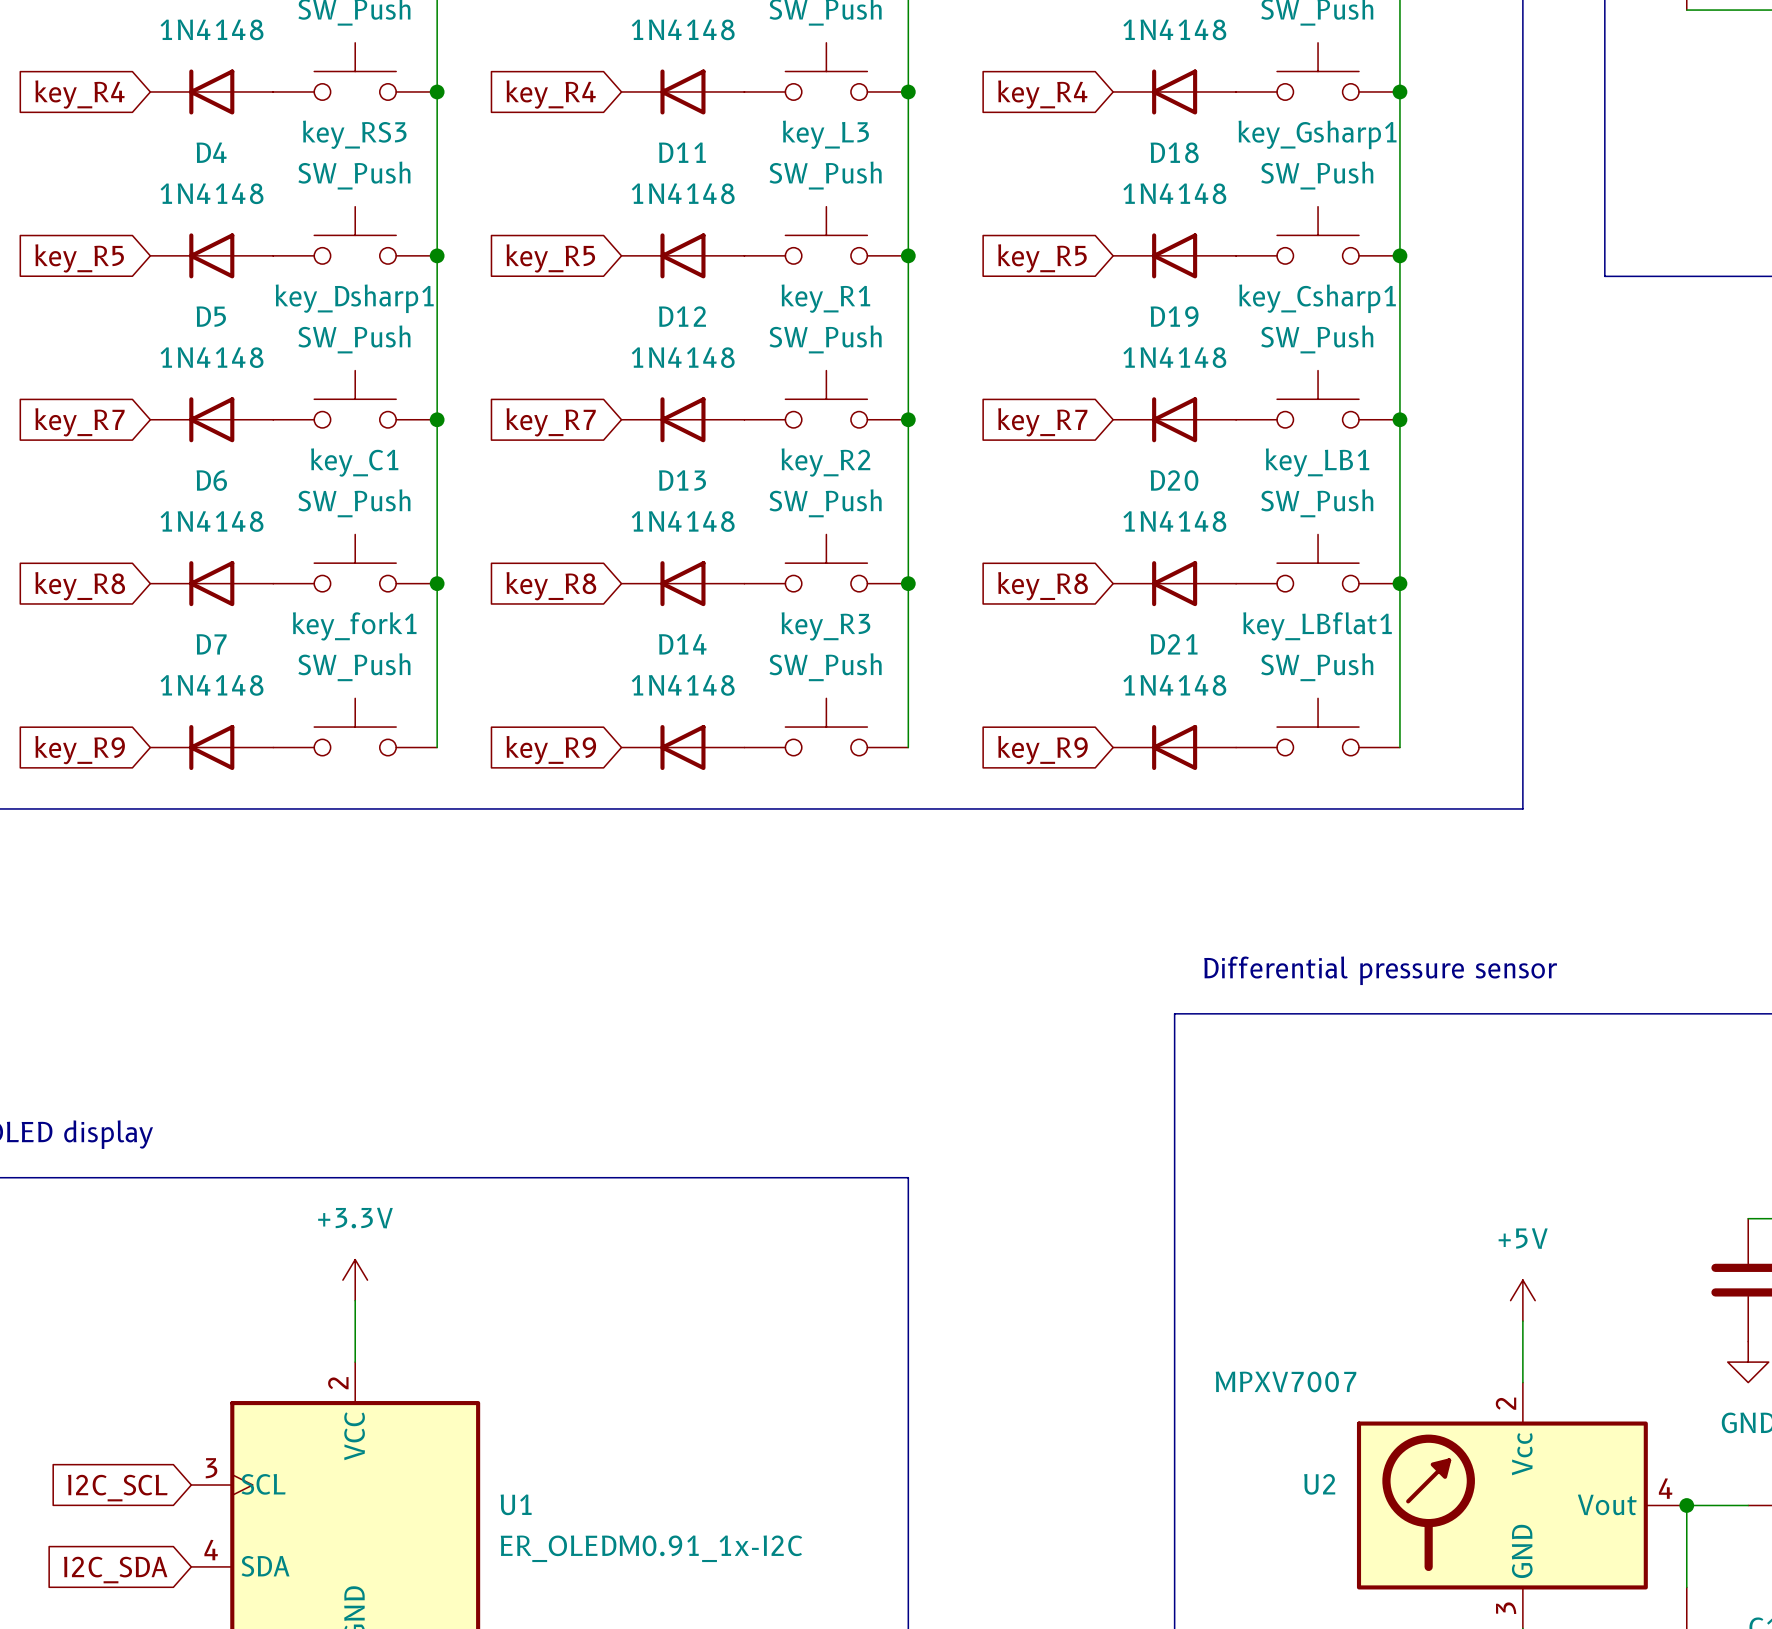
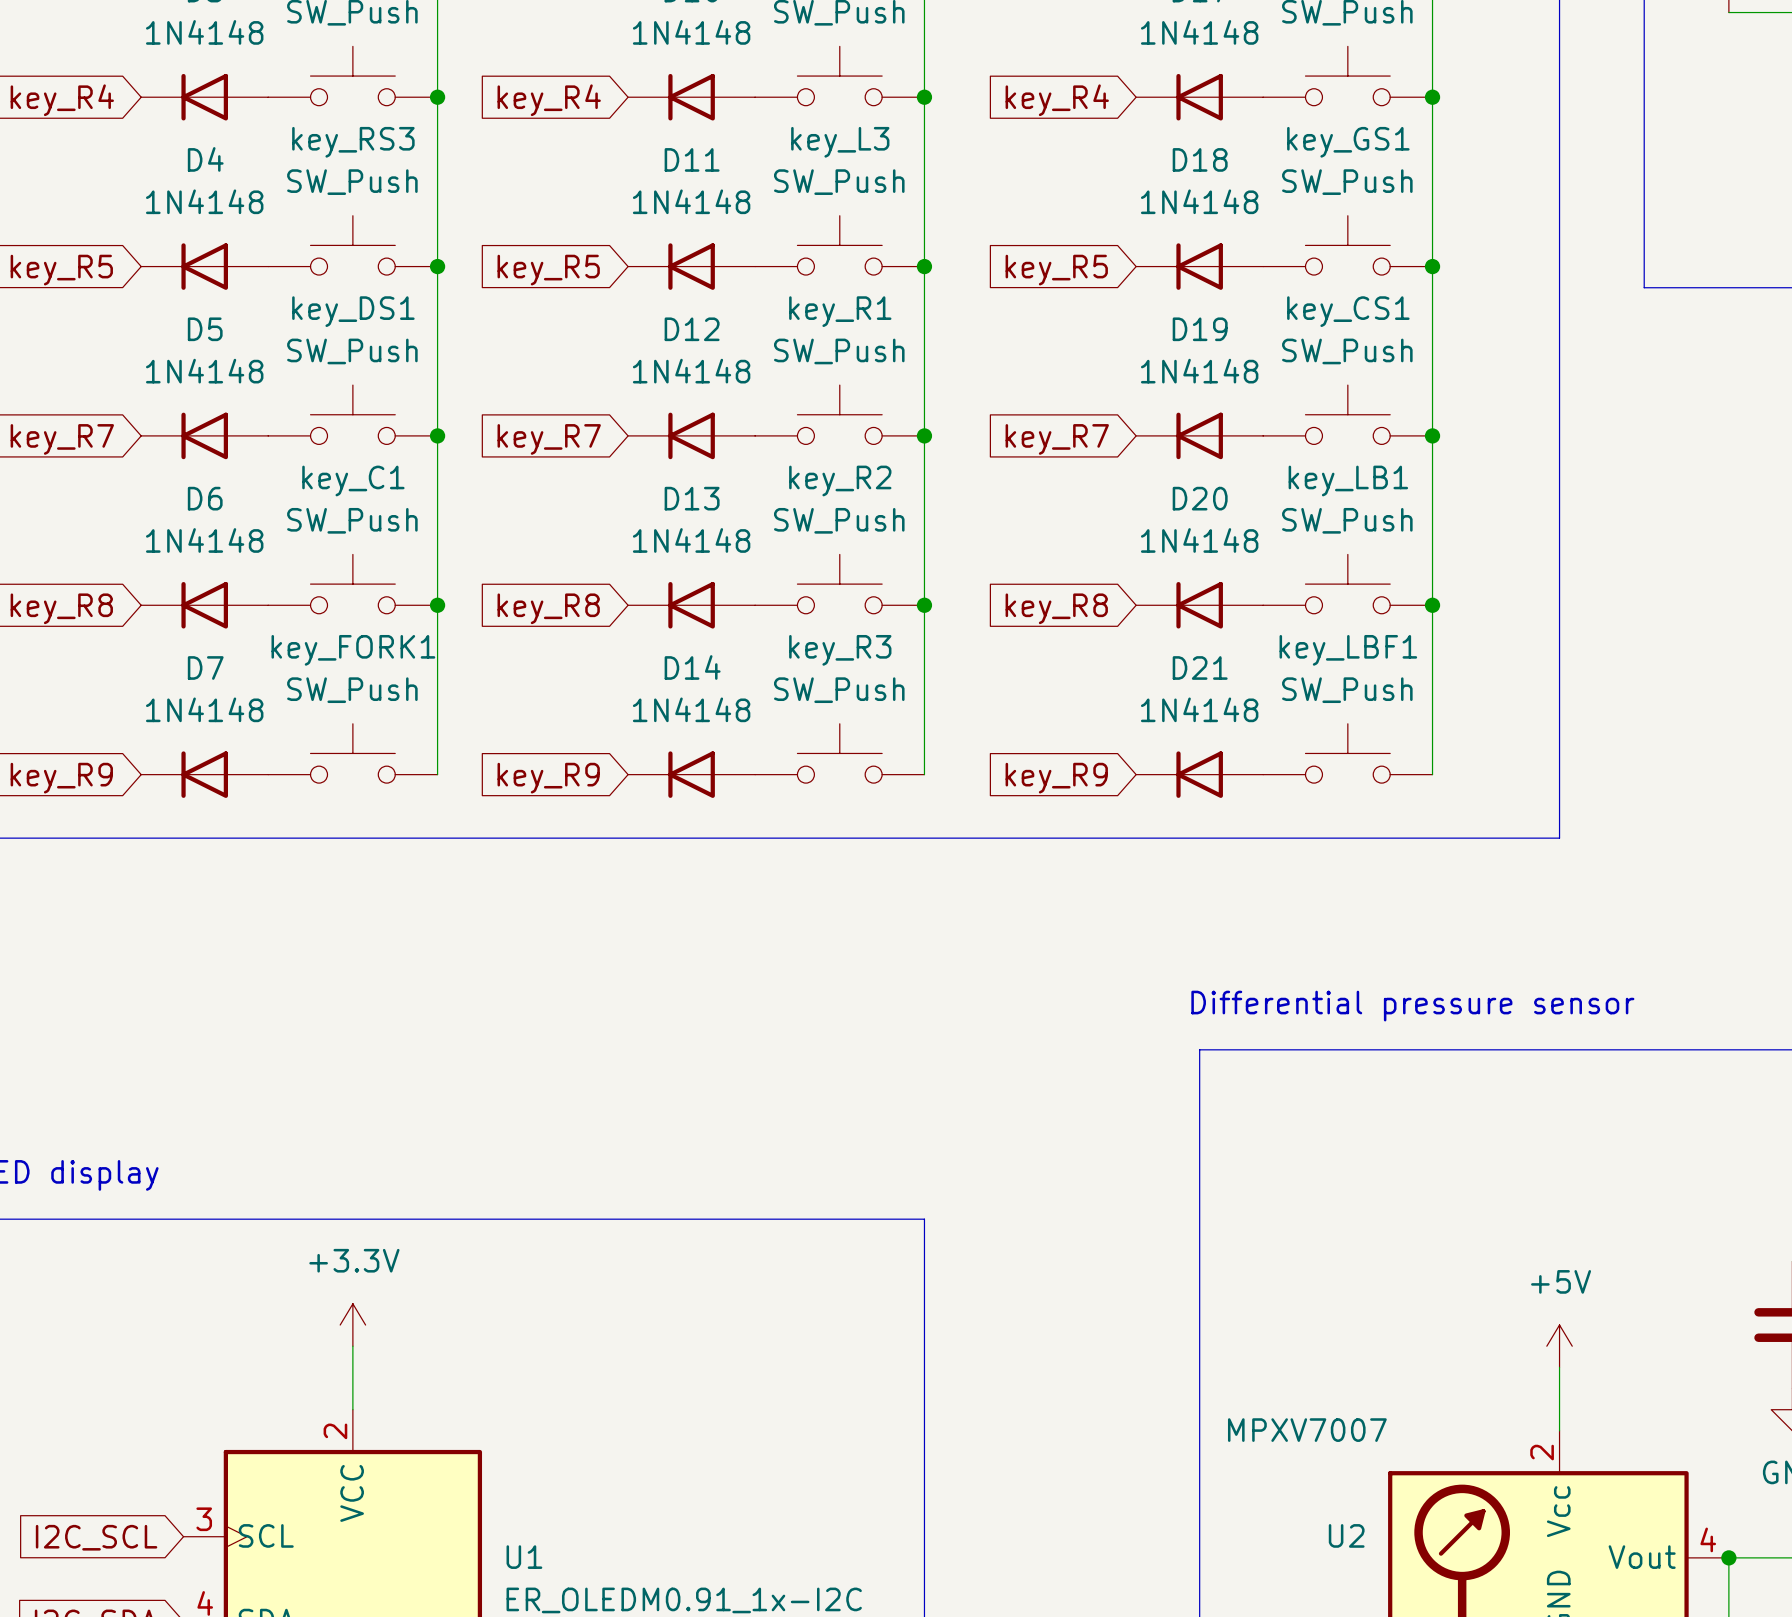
key_Gsharp1 name: key_Gsharp1 (1317, 134) -> key_GS1 (1348, 142)
key_Dsharp1 name: key_Dsharp1 (354, 298) -> key_DS1 (353, 311)
key_Csharp1 name: key_Csharp1 (1317, 298) -> key_CS1 (1348, 311)
key_fork1 name: key_fork1 (354, 626) -> key_FORK1 (353, 650)
key_LBflat1 name: key_LBflat1 (1317, 626) -> key_LBF1 (1348, 650)

